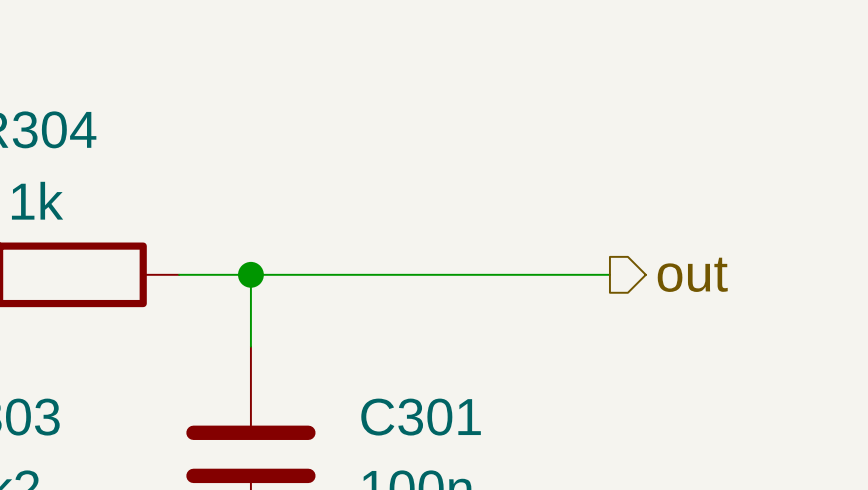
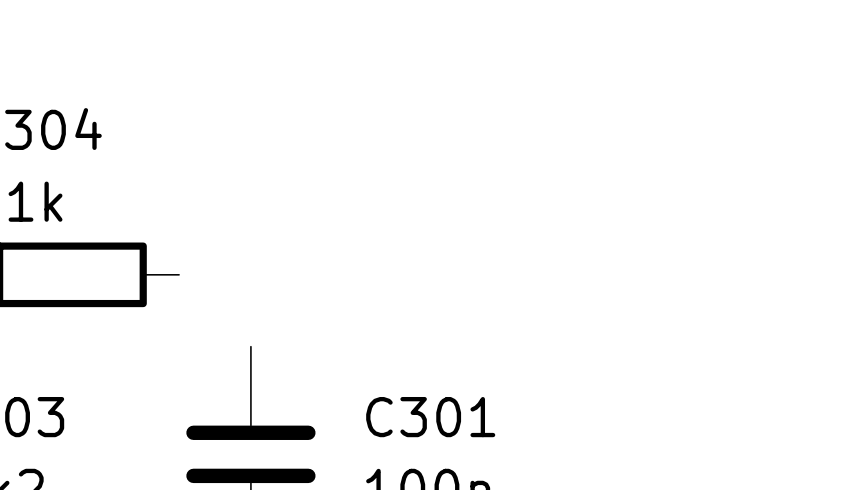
wire: (179, 274) (609, 274) -> none
wire: (250, 274) (250, 346) -> none
junction: (250, 274) -> none
hierarchical label: out (692, 274) -> none

